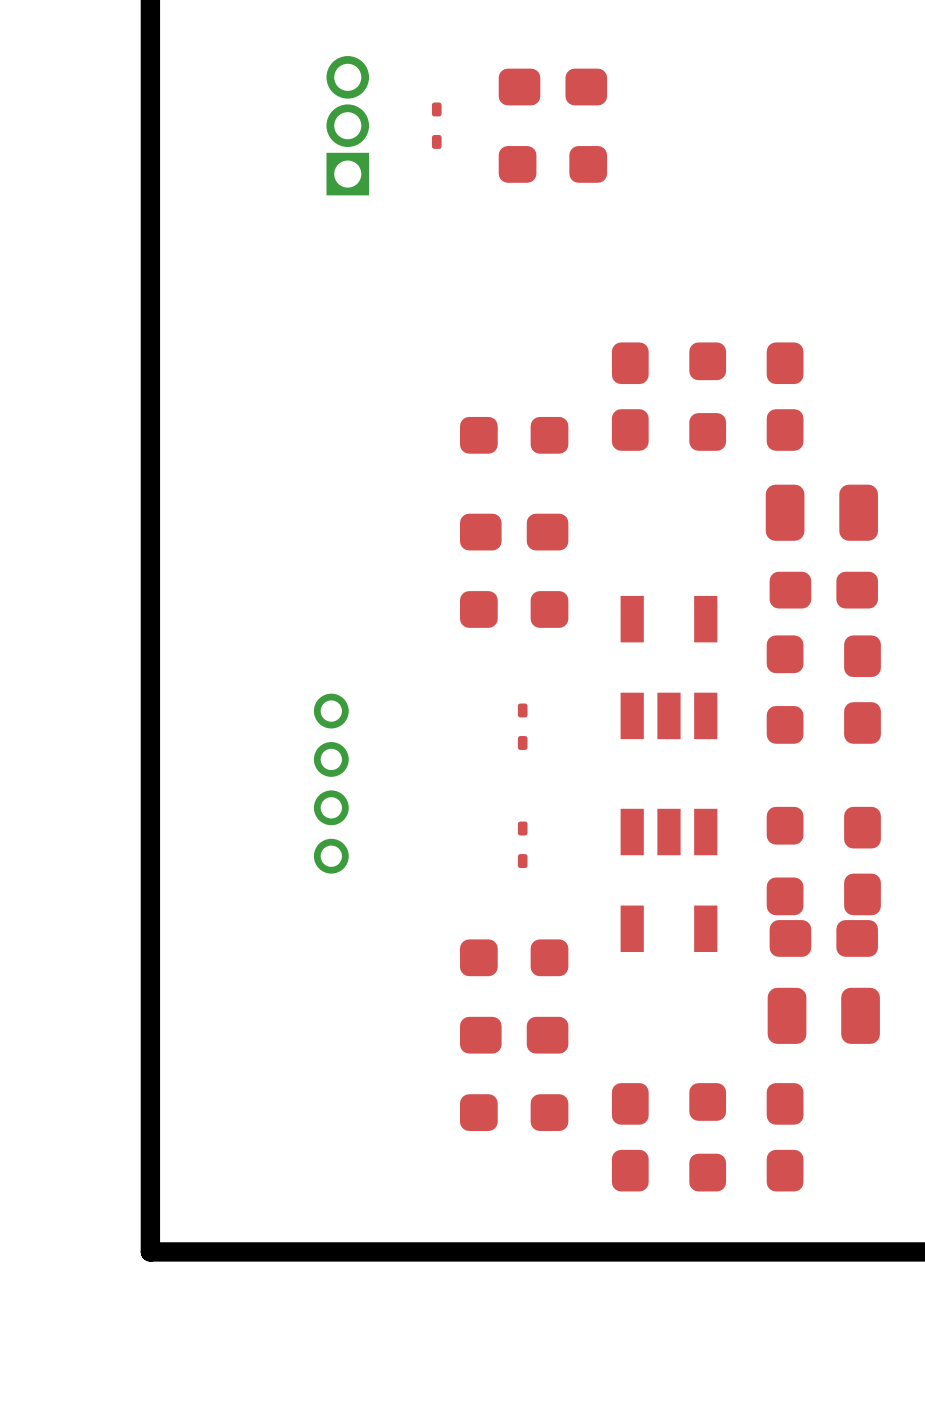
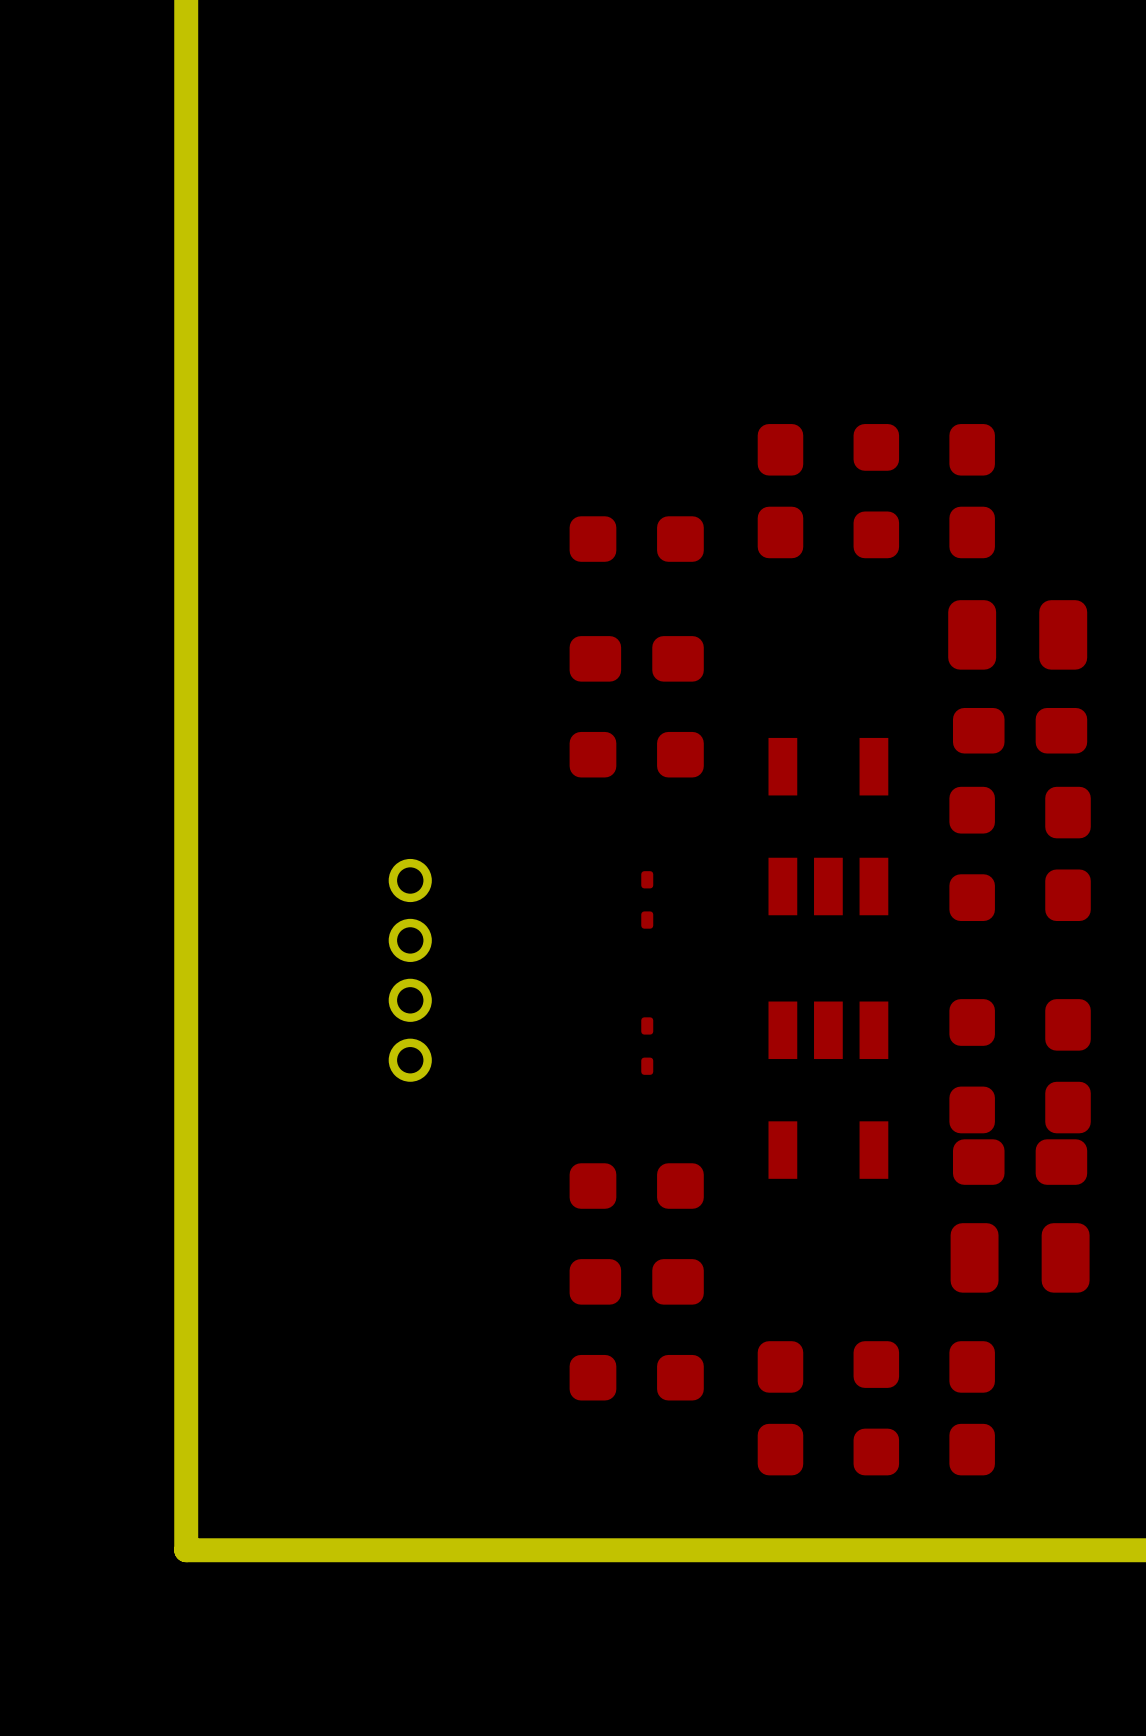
part: (552, 87) -> none
part: (347, 125) -> none
part: (436, 125) -> none
part: (552, 164) -> none

